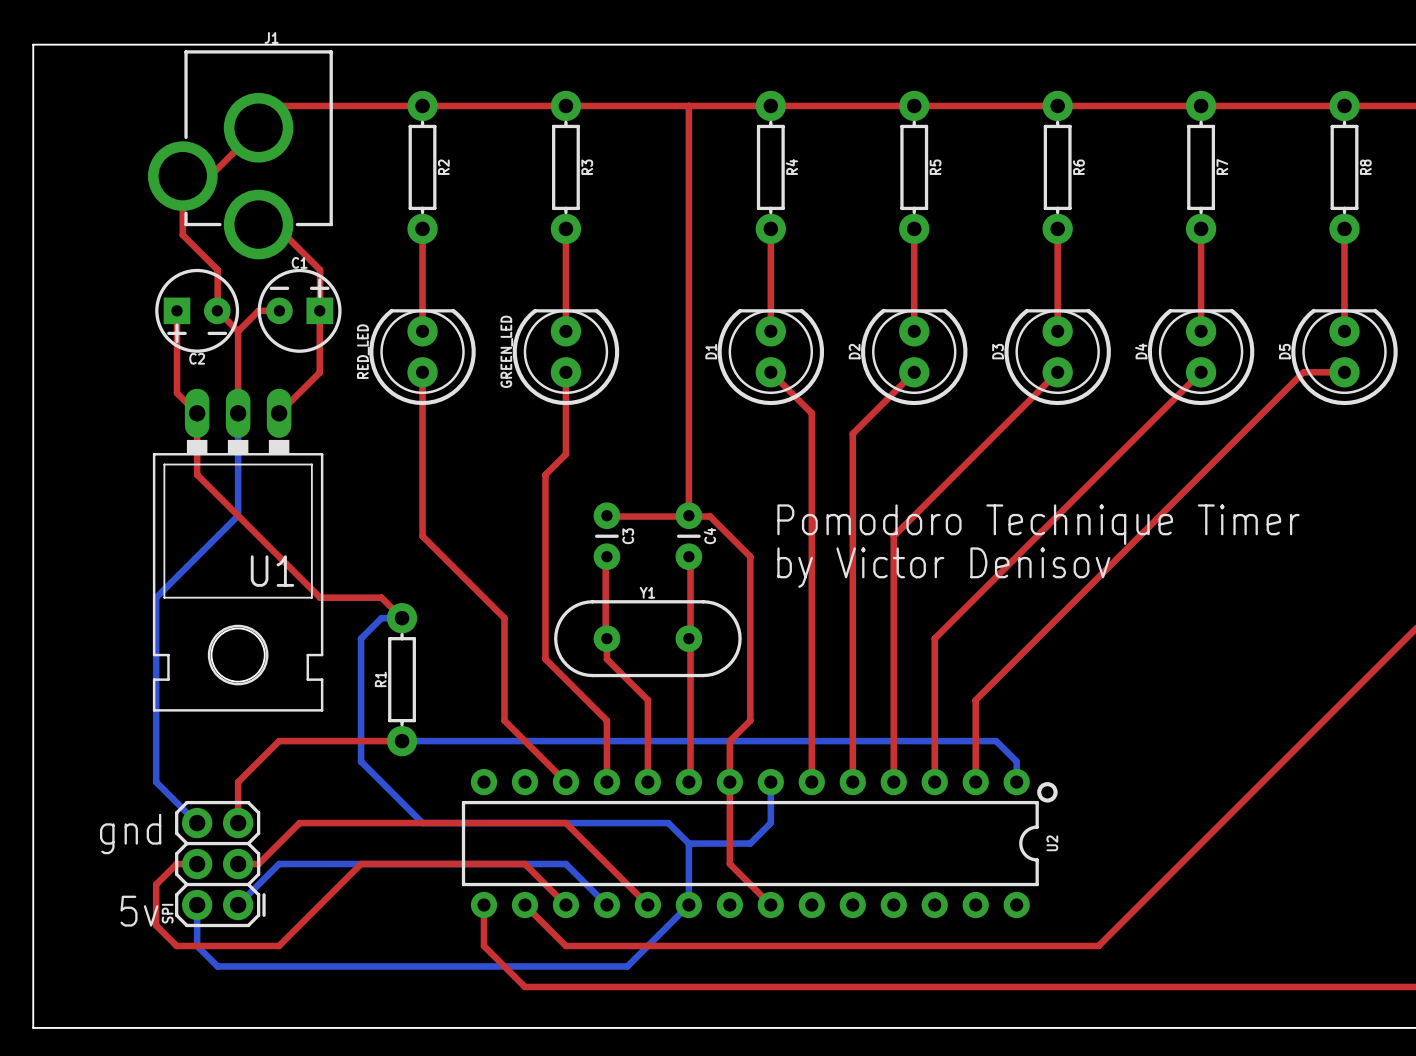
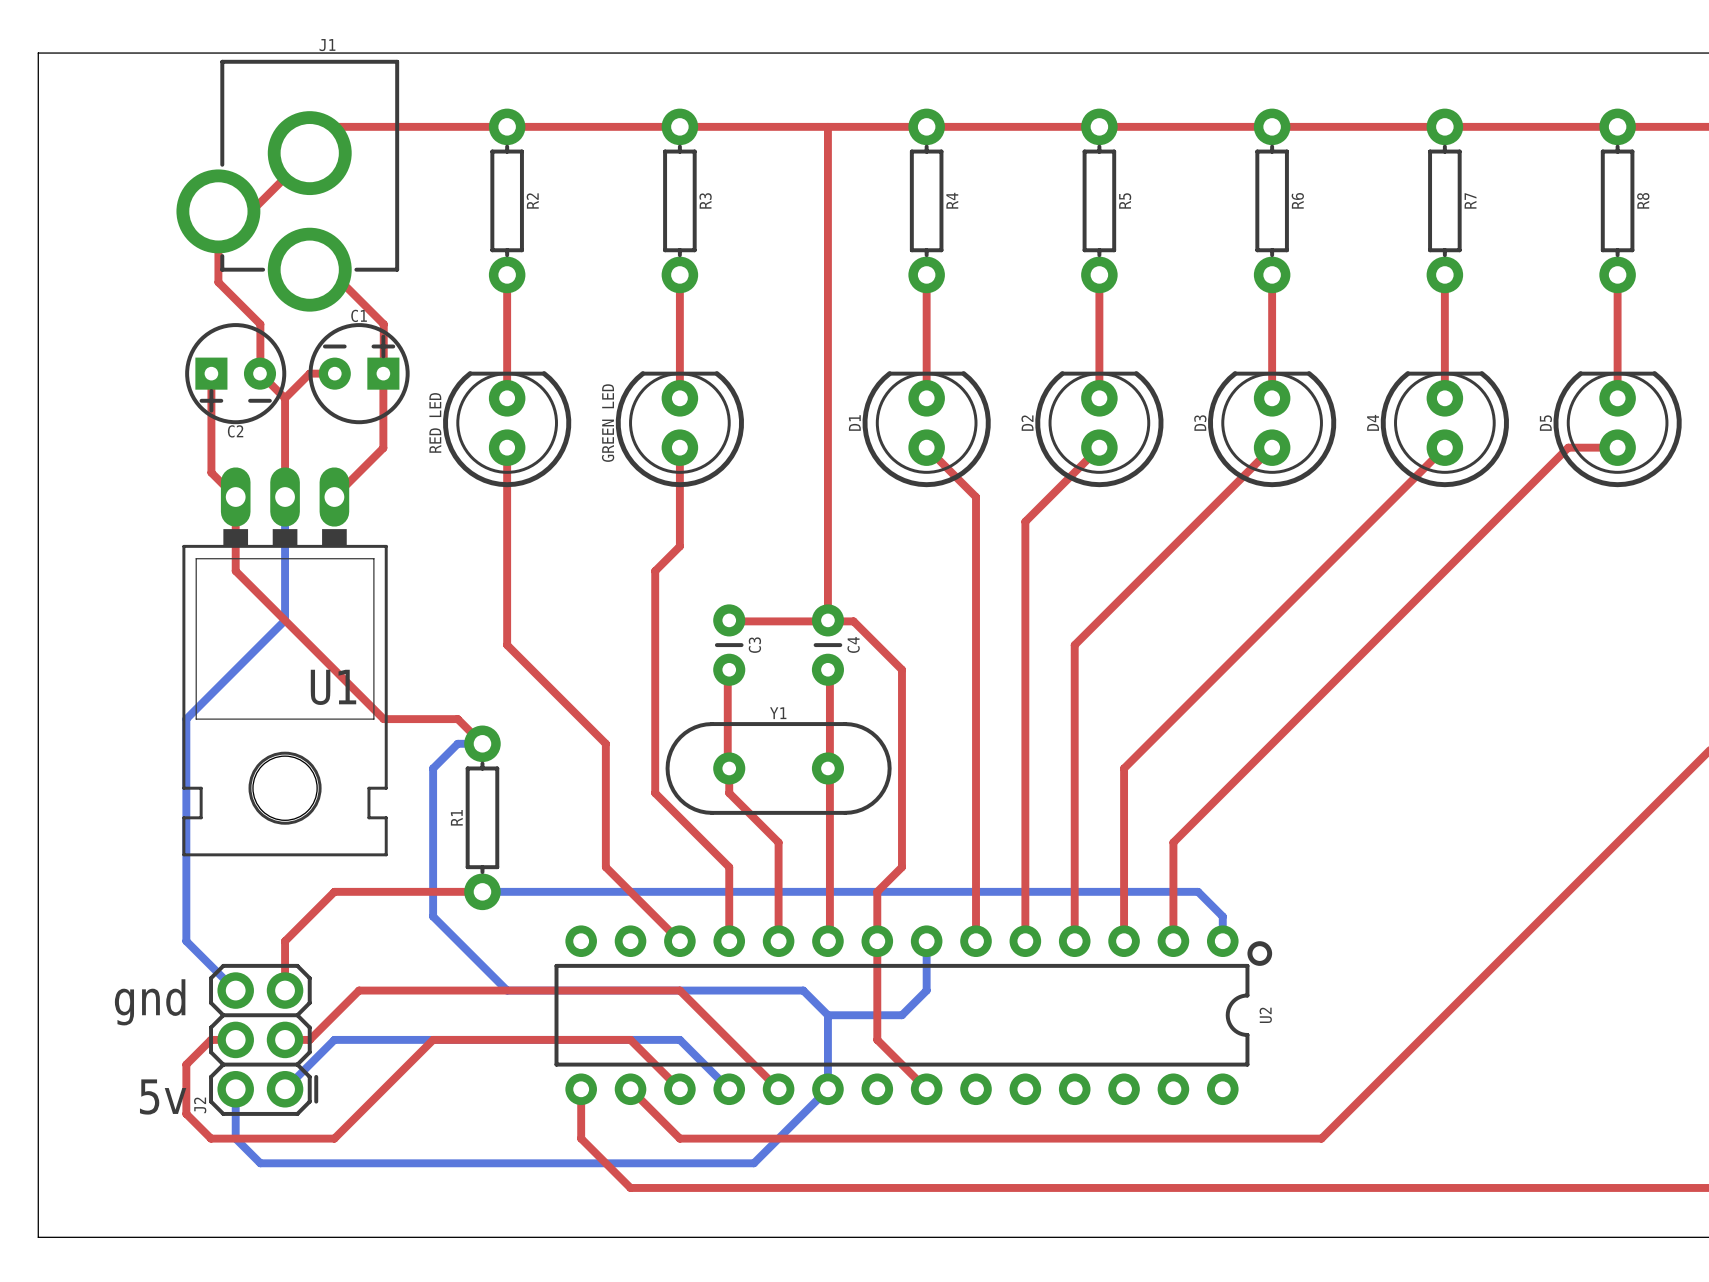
text: Pomodoro Technique Timer (1038, 524) -> none
text: by Victor Denisov (943, 567) -> none
SPI name: SPI (167, 913) -> J2 (200, 1105)

